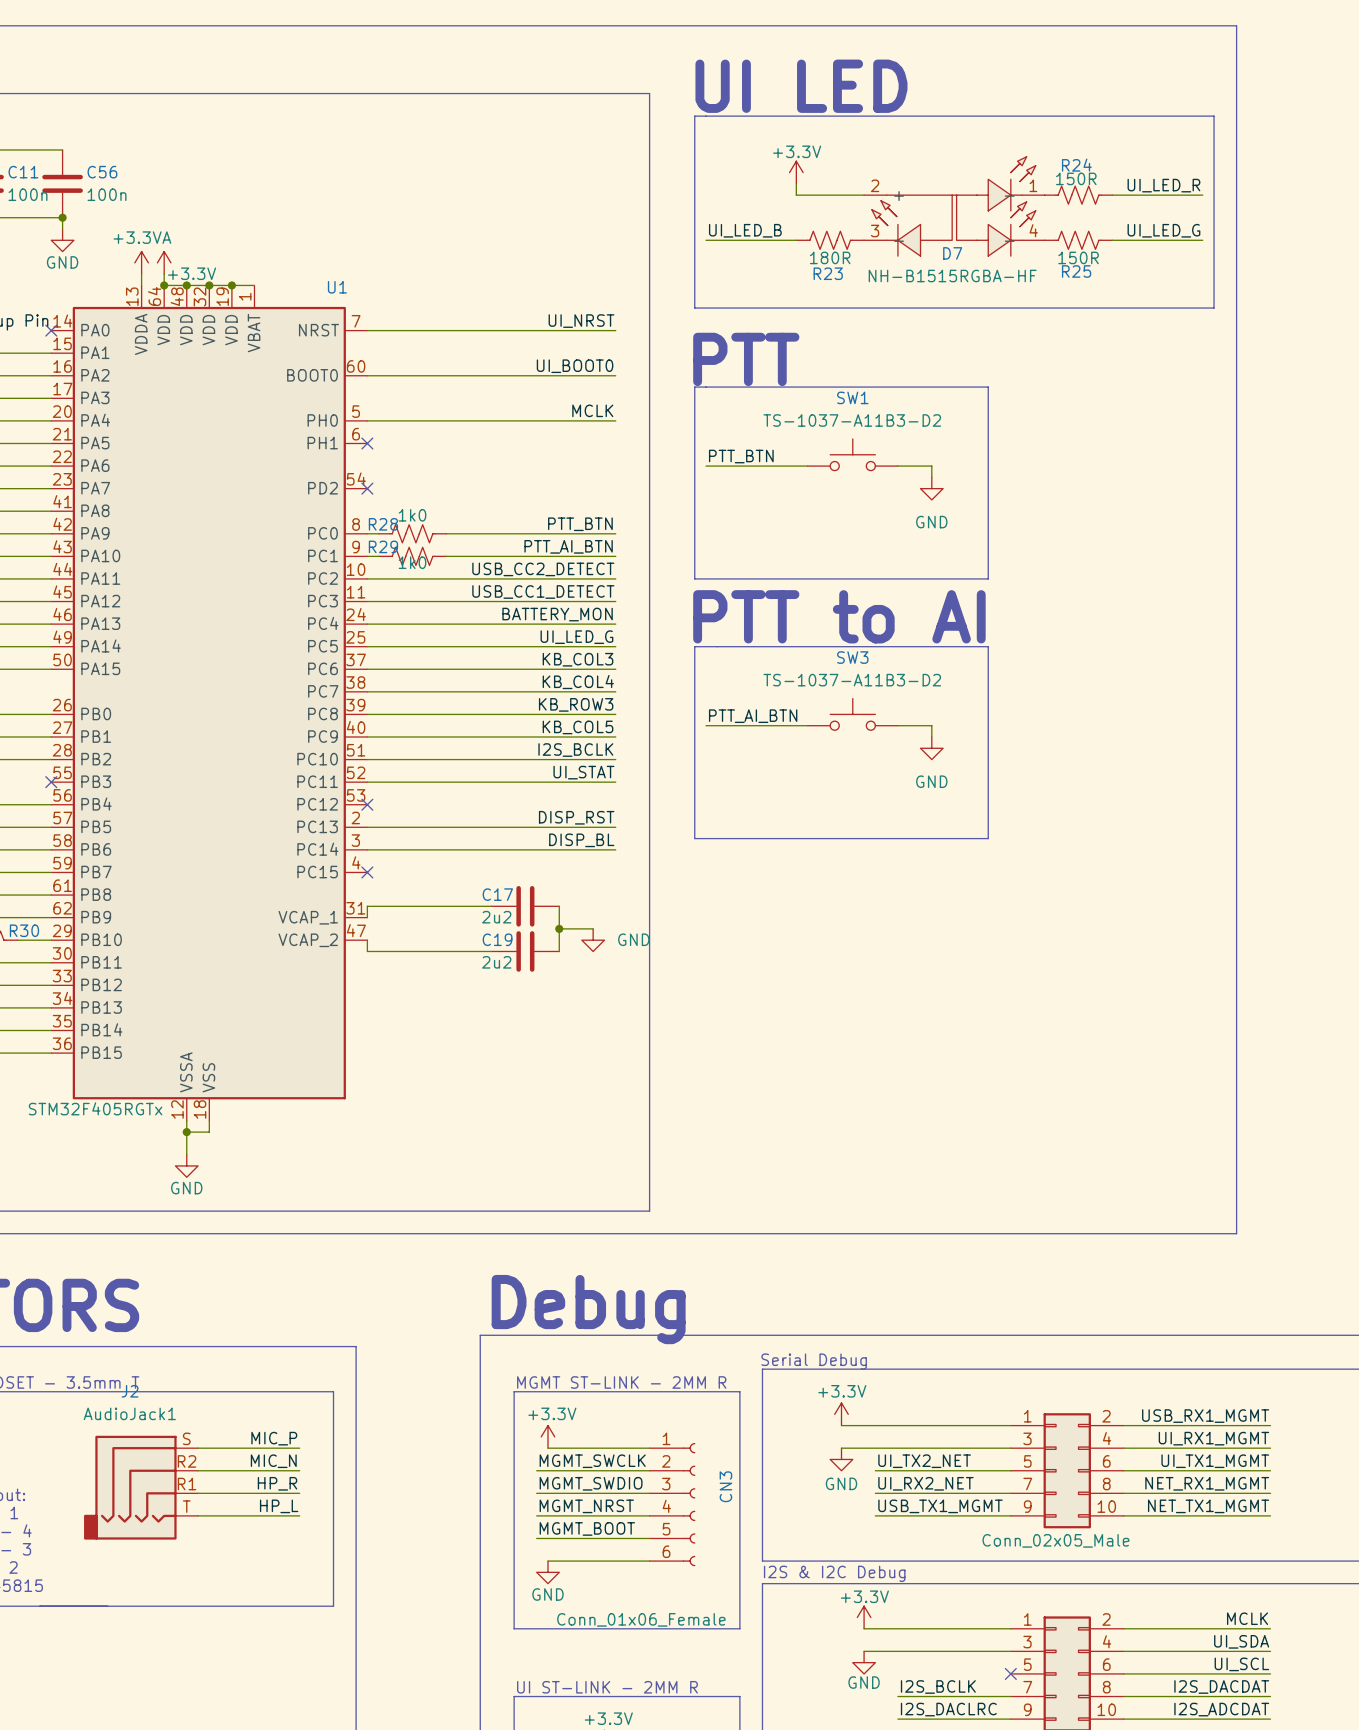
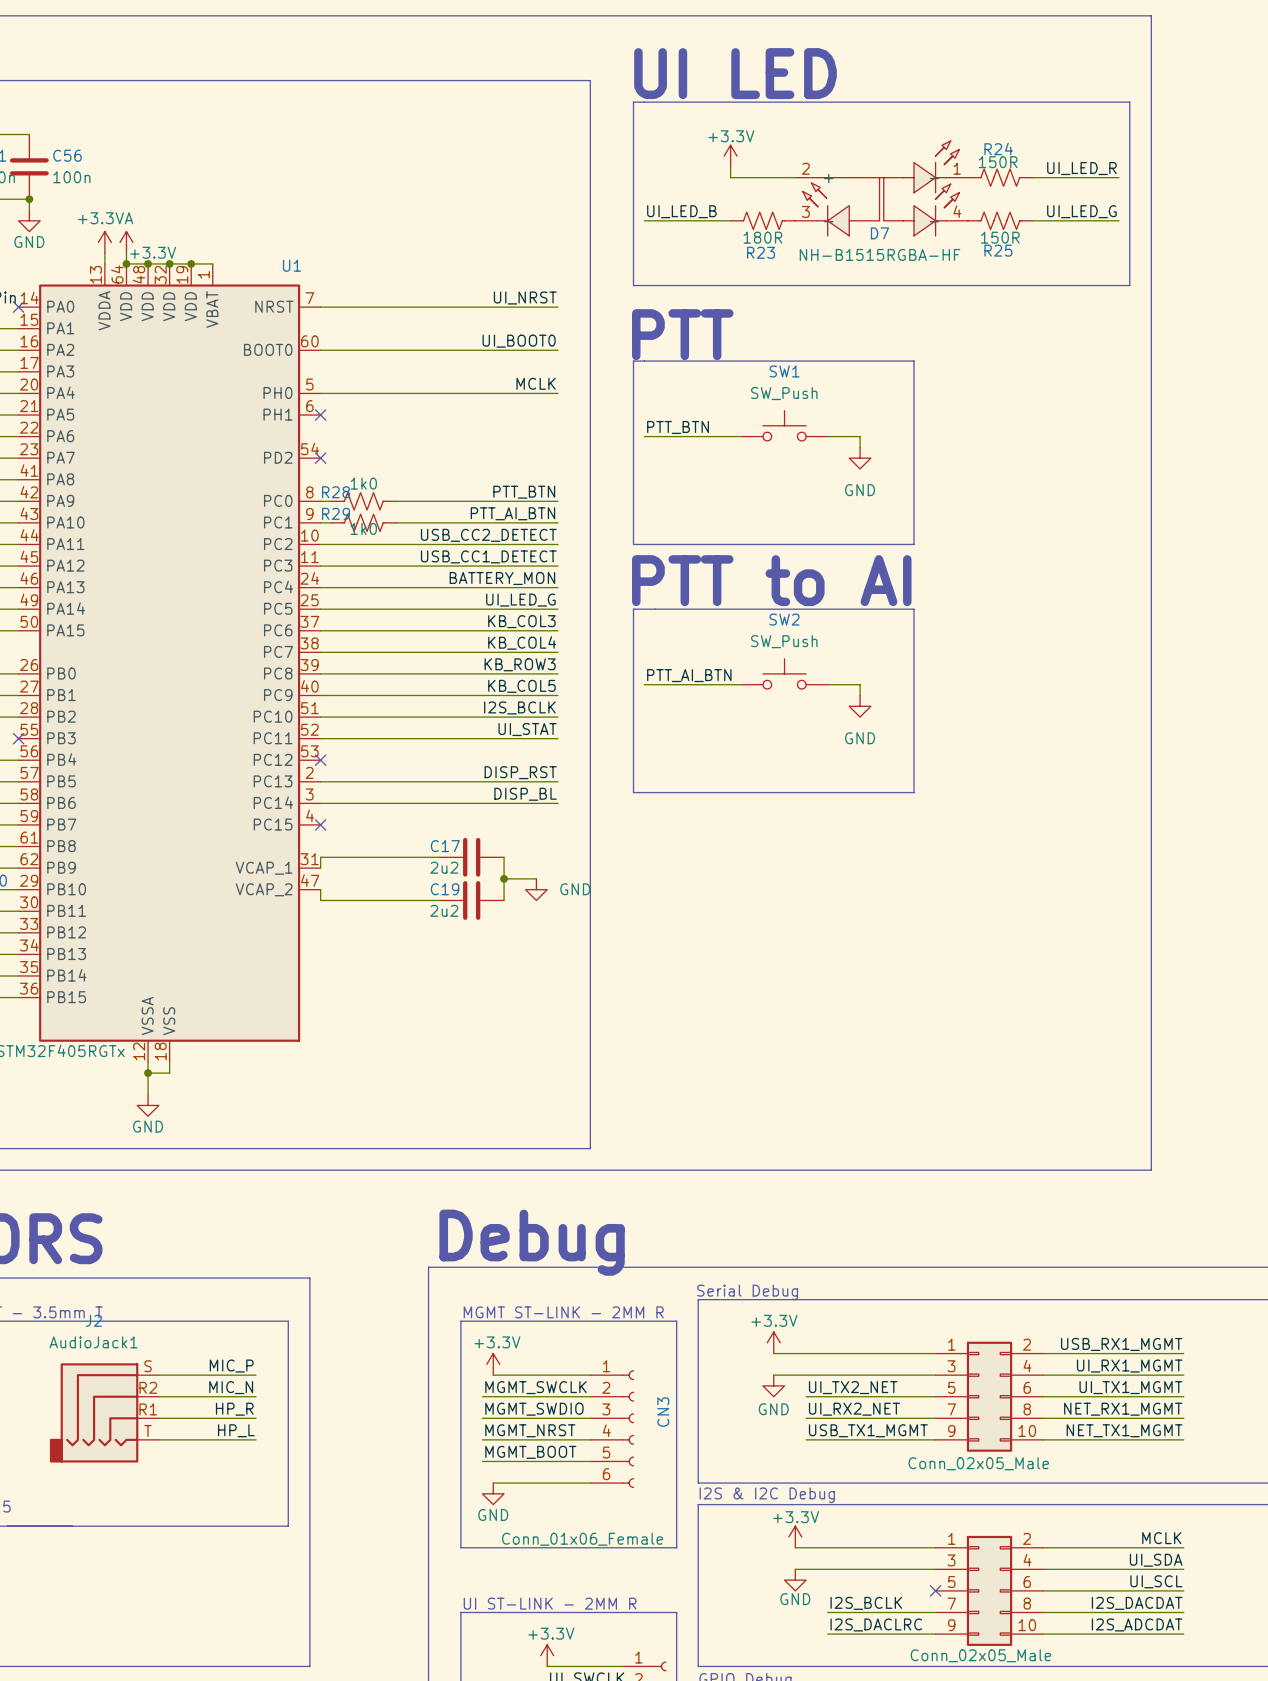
SW1 value: TS-1037-A11B3-D2 (852, 420) -> SW_Push (784, 393)
SW3 name: SW3 (852, 657) -> SW2 (784, 619)
SW3 value: TS-1037-A11B3-D2 (852, 680) -> SW_Push (784, 641)

